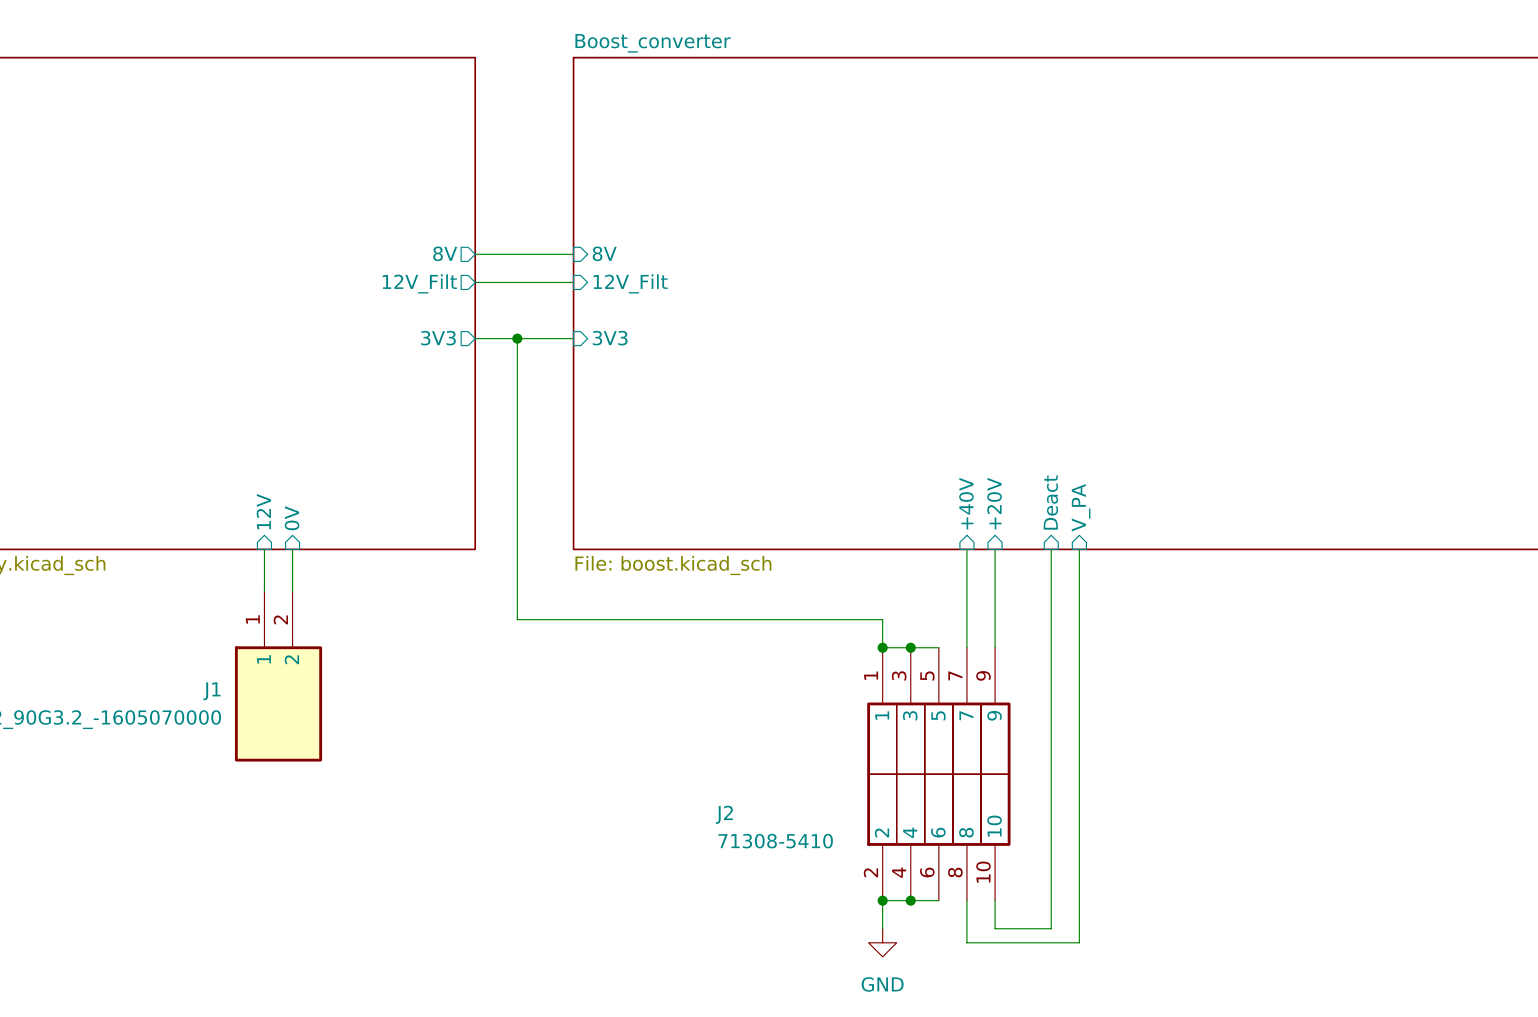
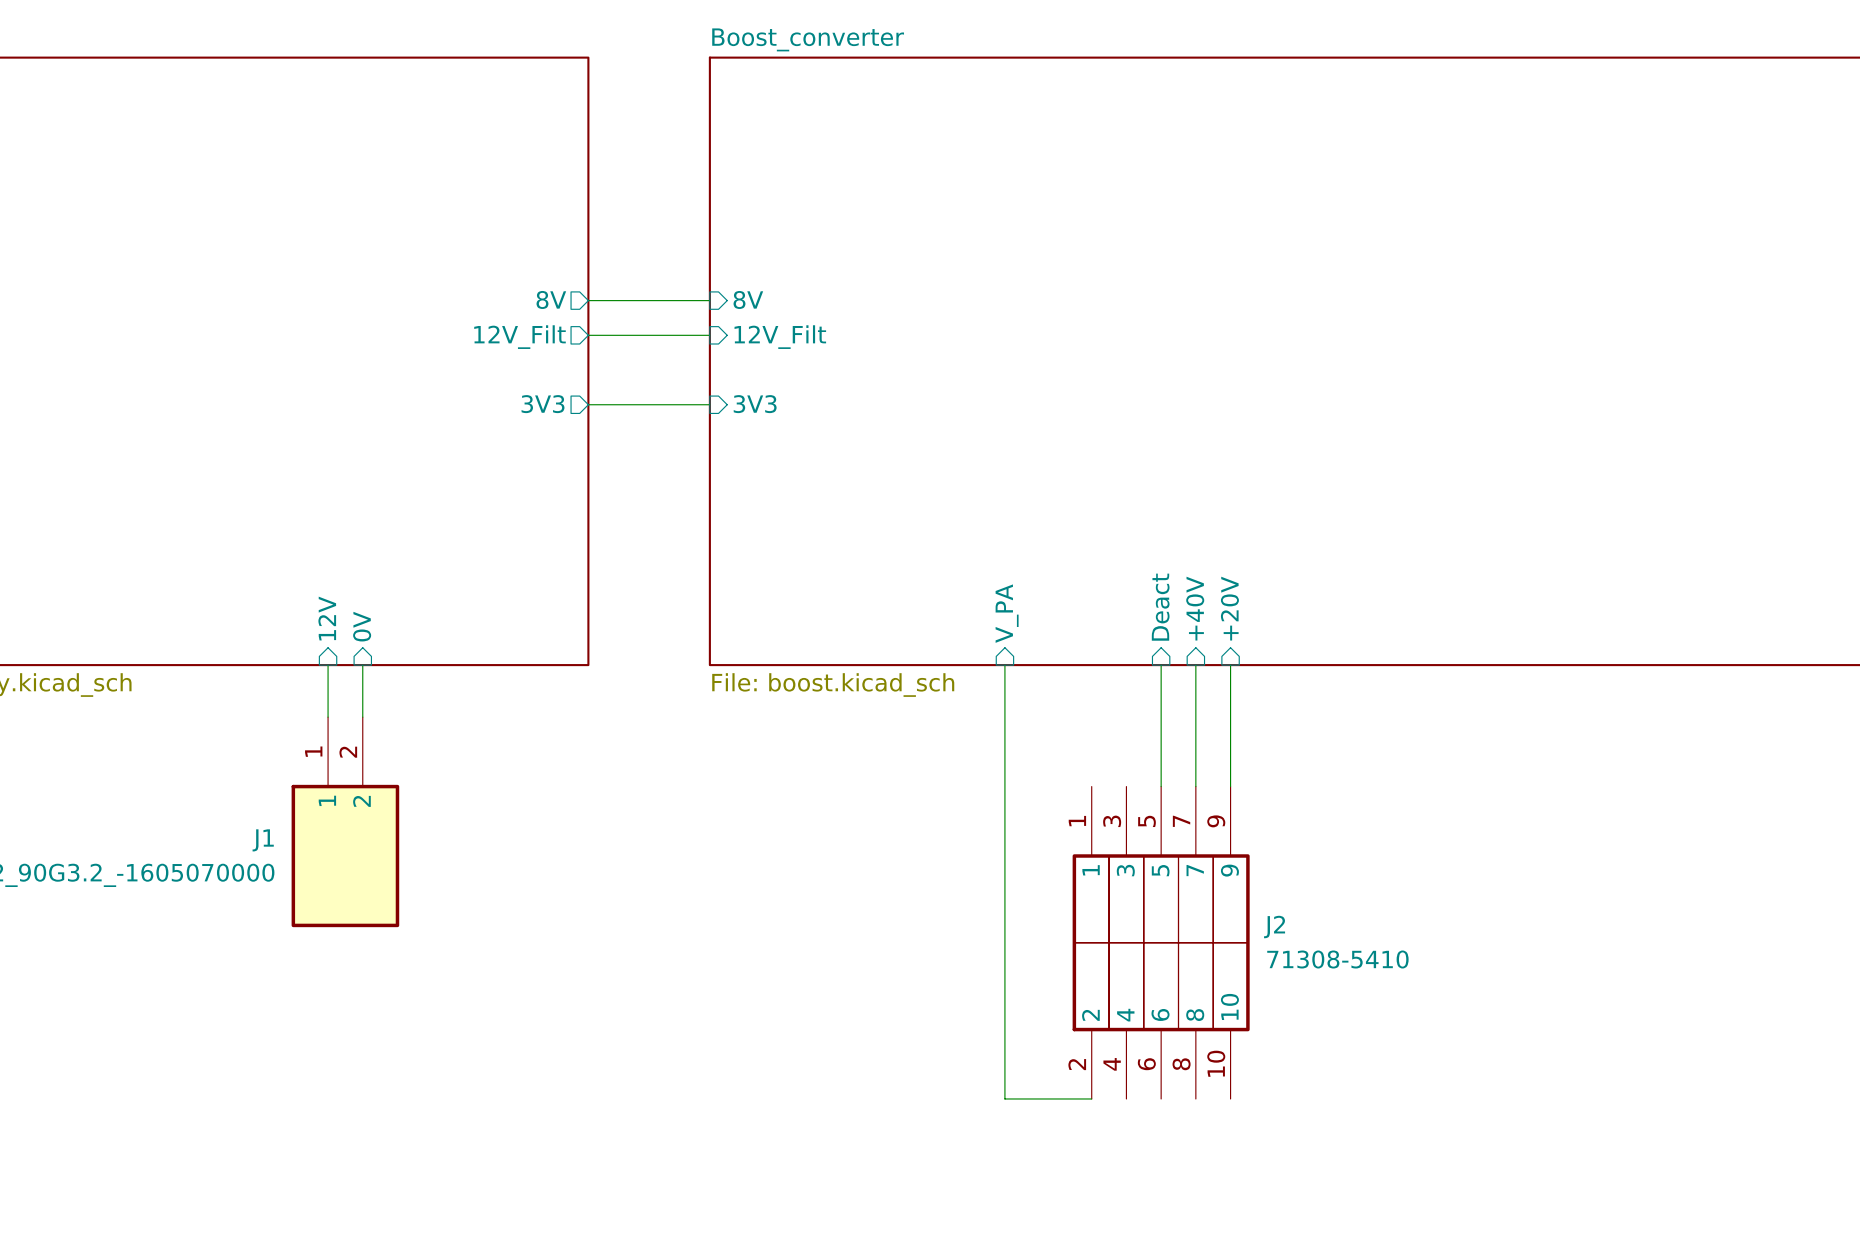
wire: (517, 338) (517, 619) (882, 619) (882, 647) (938, 647) -> (1161, 665) (1161, 786)
junction: (517, 338) -> none
sheet pin position: Deact (1050, 502) -> Deact (1160, 607)
sheet pin position: V_PA (1081, 507) -> V_PA (1007, 613)
wire: none -> (1004, 665) (1004, 1098) (1091, 1098)
wire: (1051, 549) (1051, 928) (995, 928) (995, 900) -> none
wire: (1079, 549) (1079, 942) (966, 942) (966, 900) -> none
junction: (882, 647) -> none
junction: (910, 647) -> none
J2 name position: J2 (724, 814) -> J2 (1274, 927)
J2 value position: 71308-5410 (775, 841) -> 71308-5410 (1337, 959)
junction: (882, 900) -> none
junction: (910, 900) -> none
wire: (938, 900) (882, 900) (882, 928) -> none
power symbol: GND (882, 942) -> none

